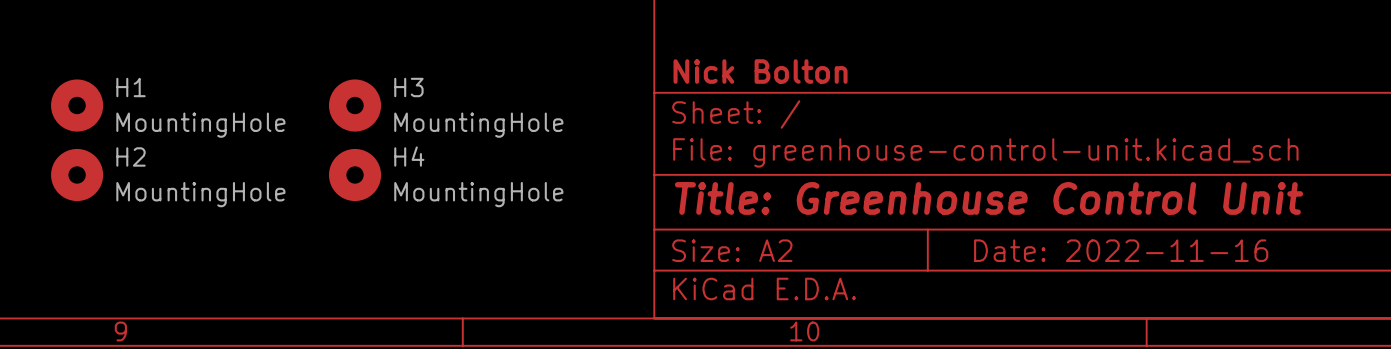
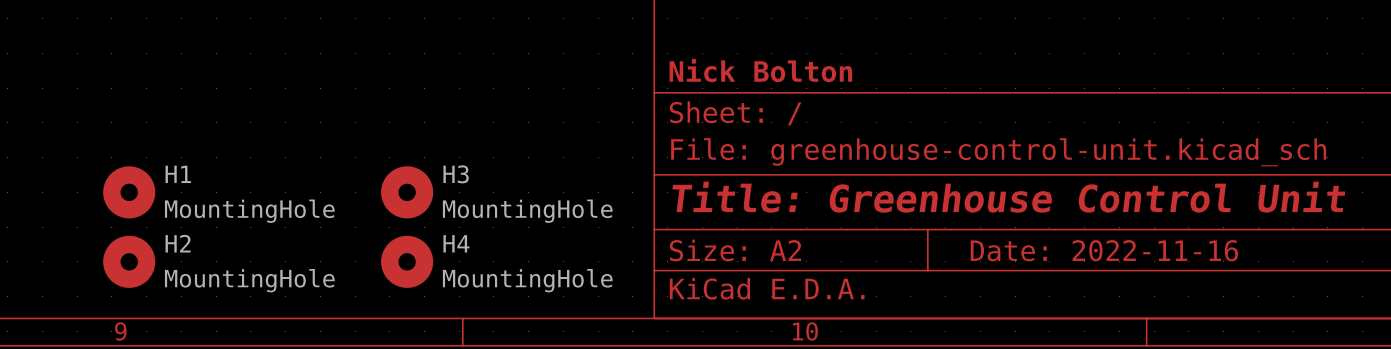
H1 position: (77, 105) -> (129, 192)
H3 position: (355, 105) -> (407, 192)
H2 position: (77, 175) -> (129, 261)
H4 position: (355, 175) -> (407, 261)

